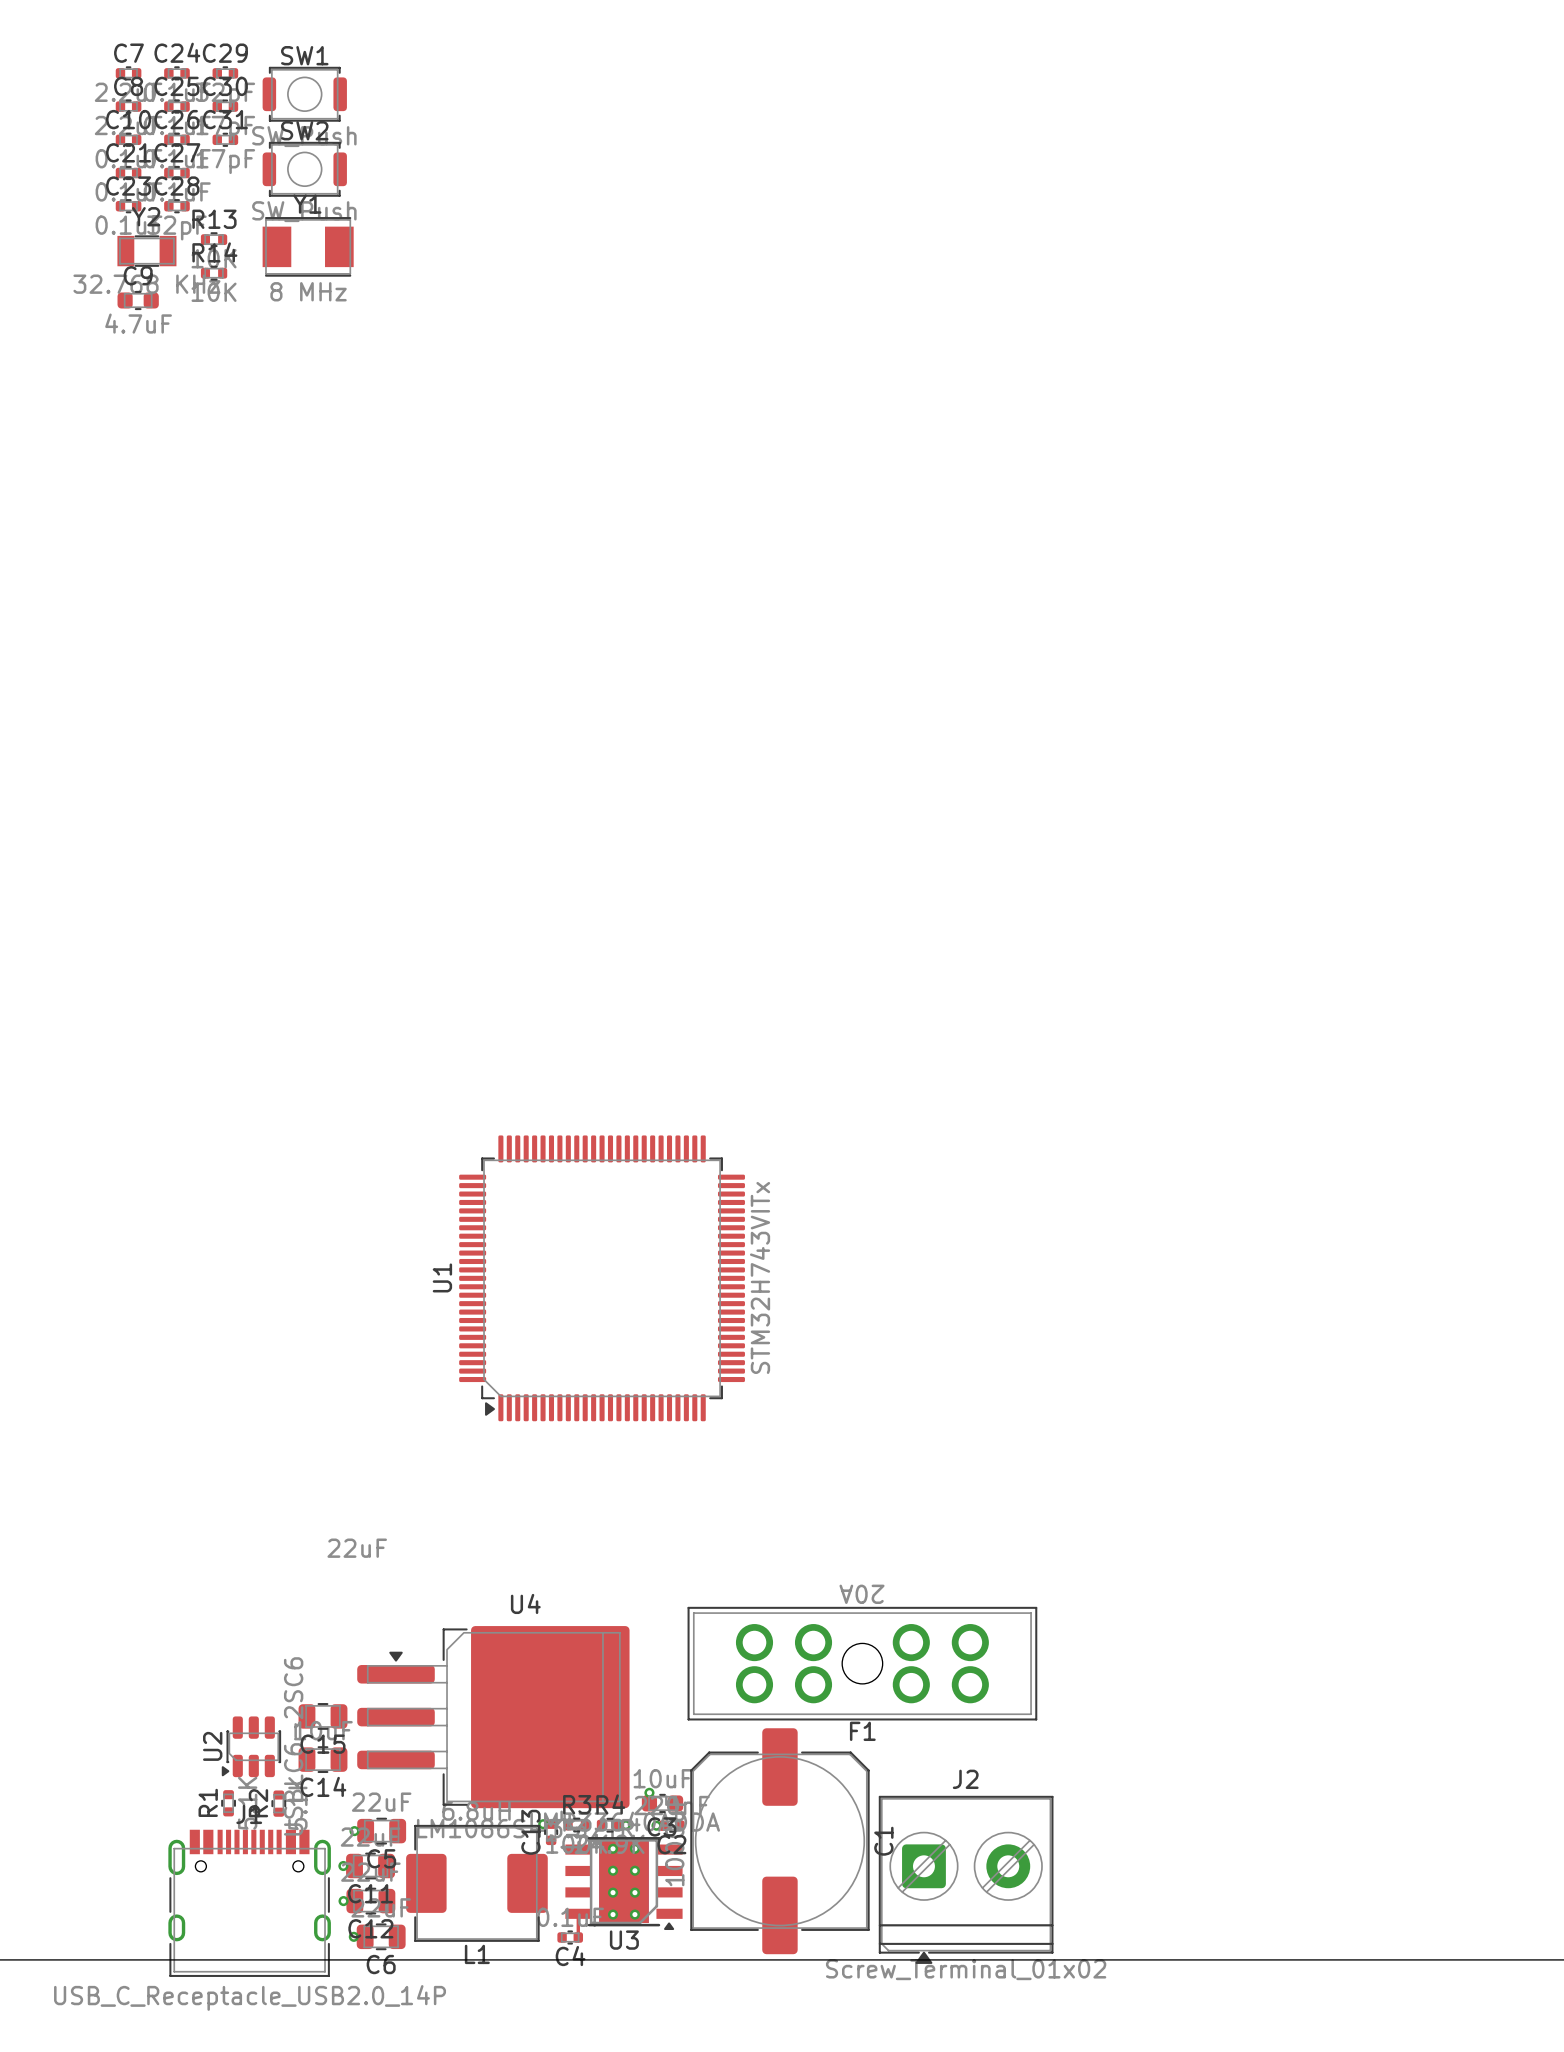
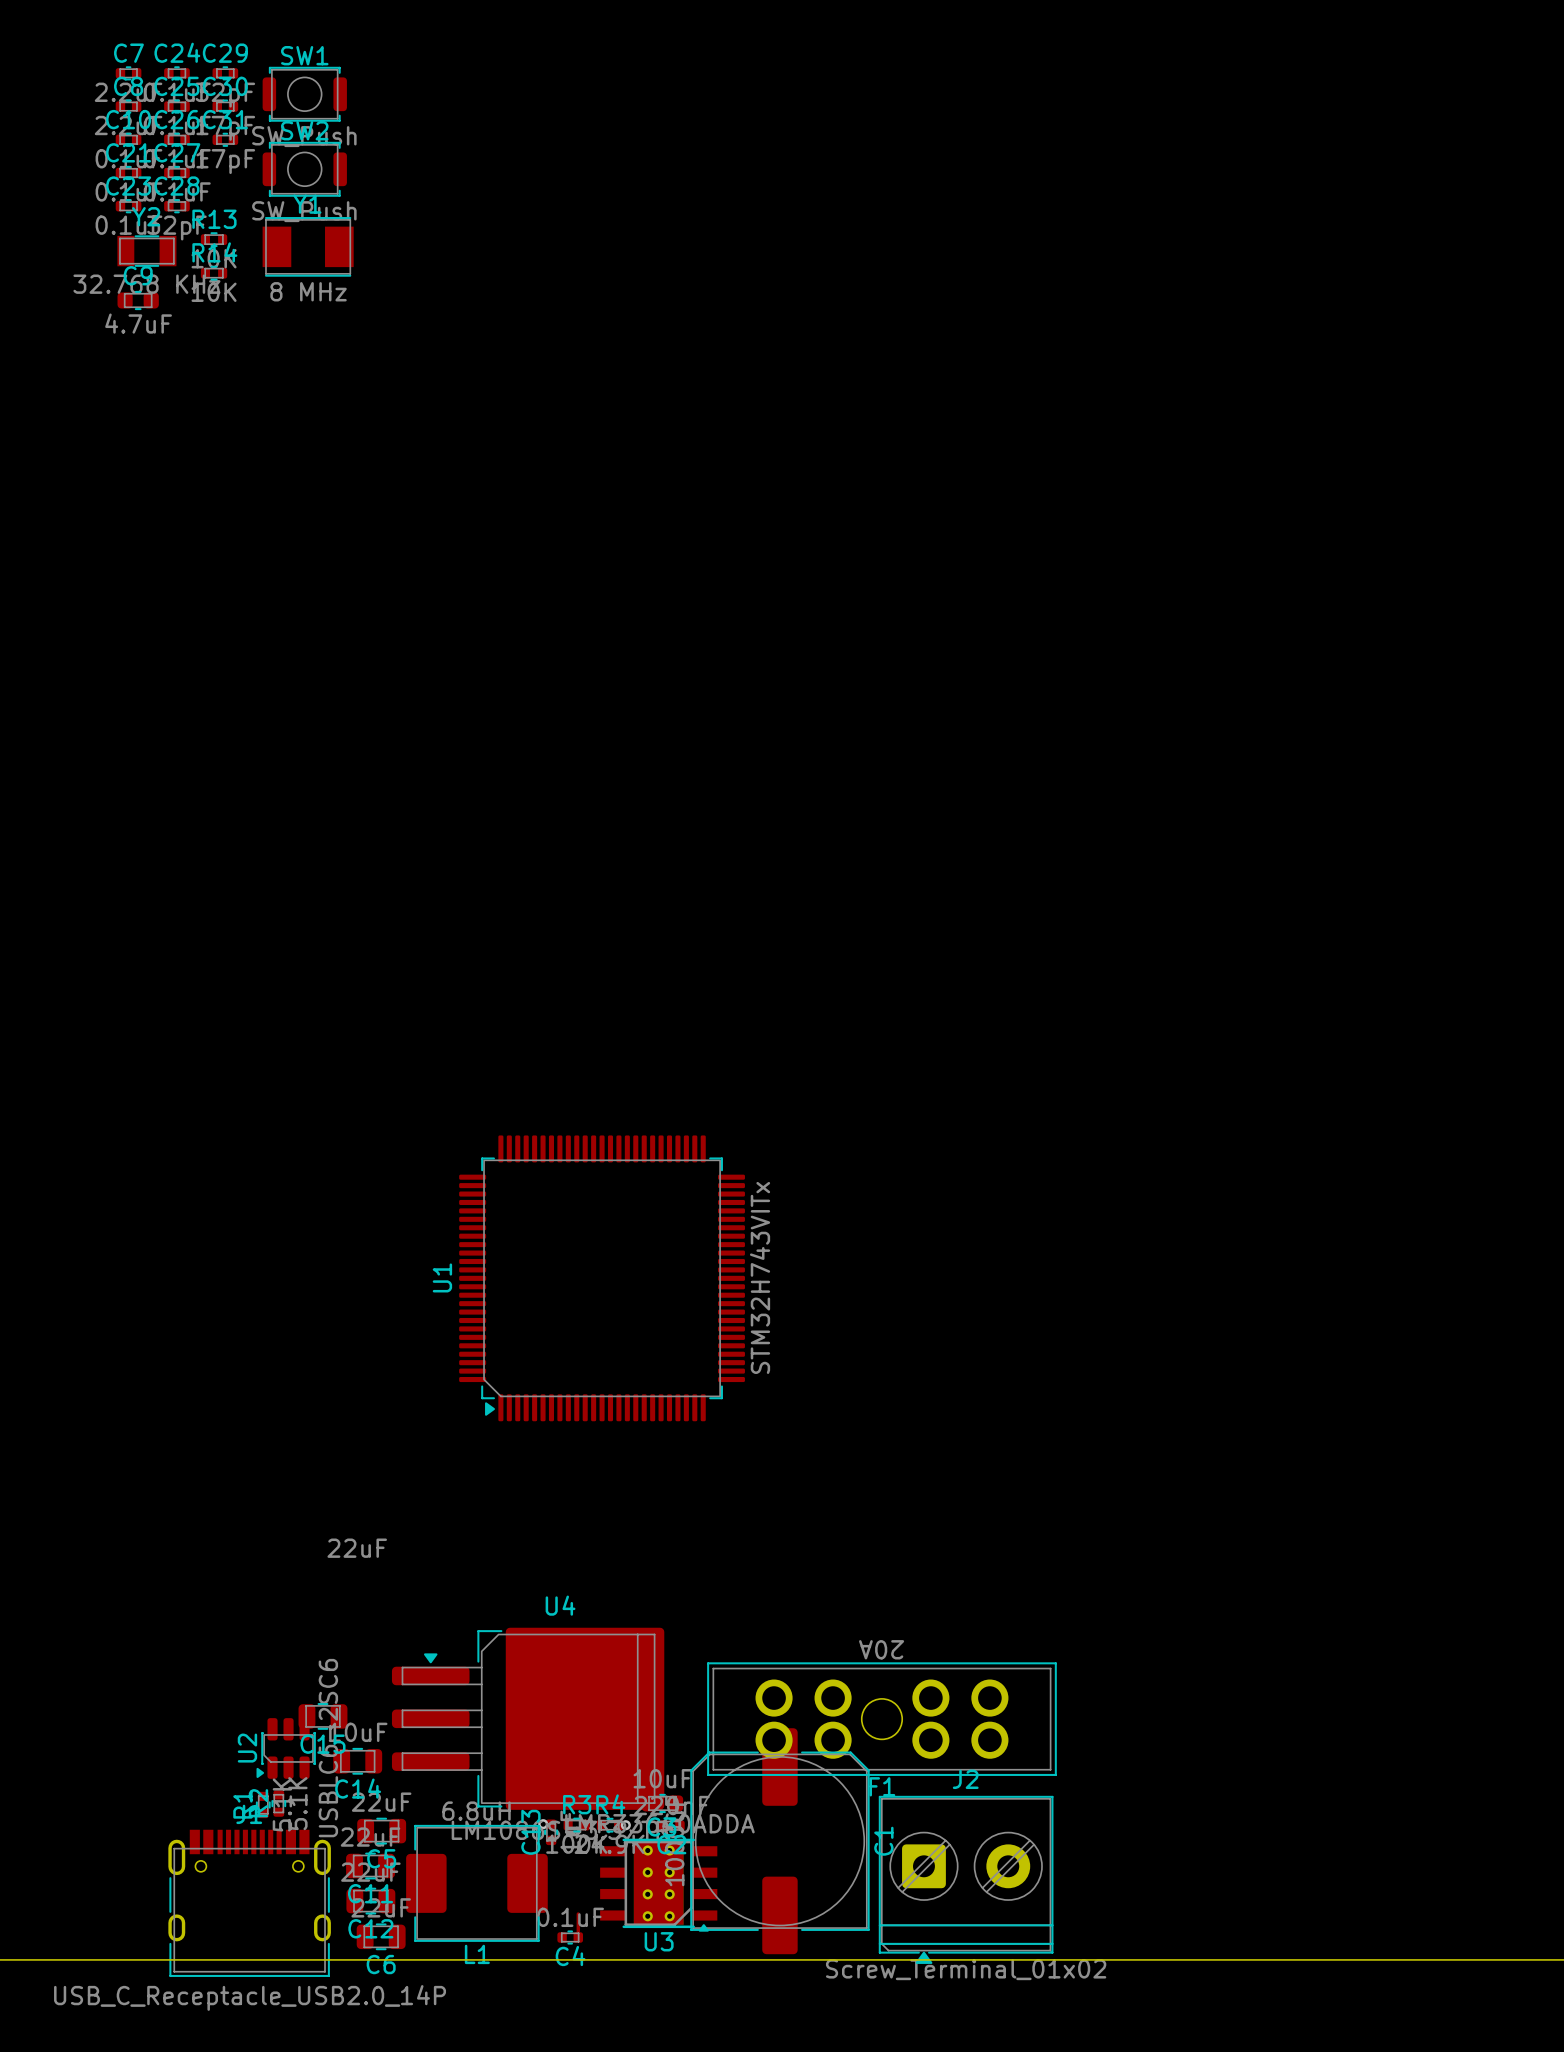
F1 position: (862, 1663) -> (881, 1719)
U4 position: (493, 1717) -> (528, 1718)
U2 position: (251, 1746) -> (286, 1748)
C14 position: (322, 1759) -> (357, 1761)
via: (649, 1792) -> none
R1 position: (228, 1803) -> (263, 1804)
via: (656, 1825) -> none
via: (354, 1831) -> none
via: (343, 1866) -> none
U3 position: (623, 1883) -> (658, 1885)
via: (343, 1901) -> none
via: (353, 1936) -> none

